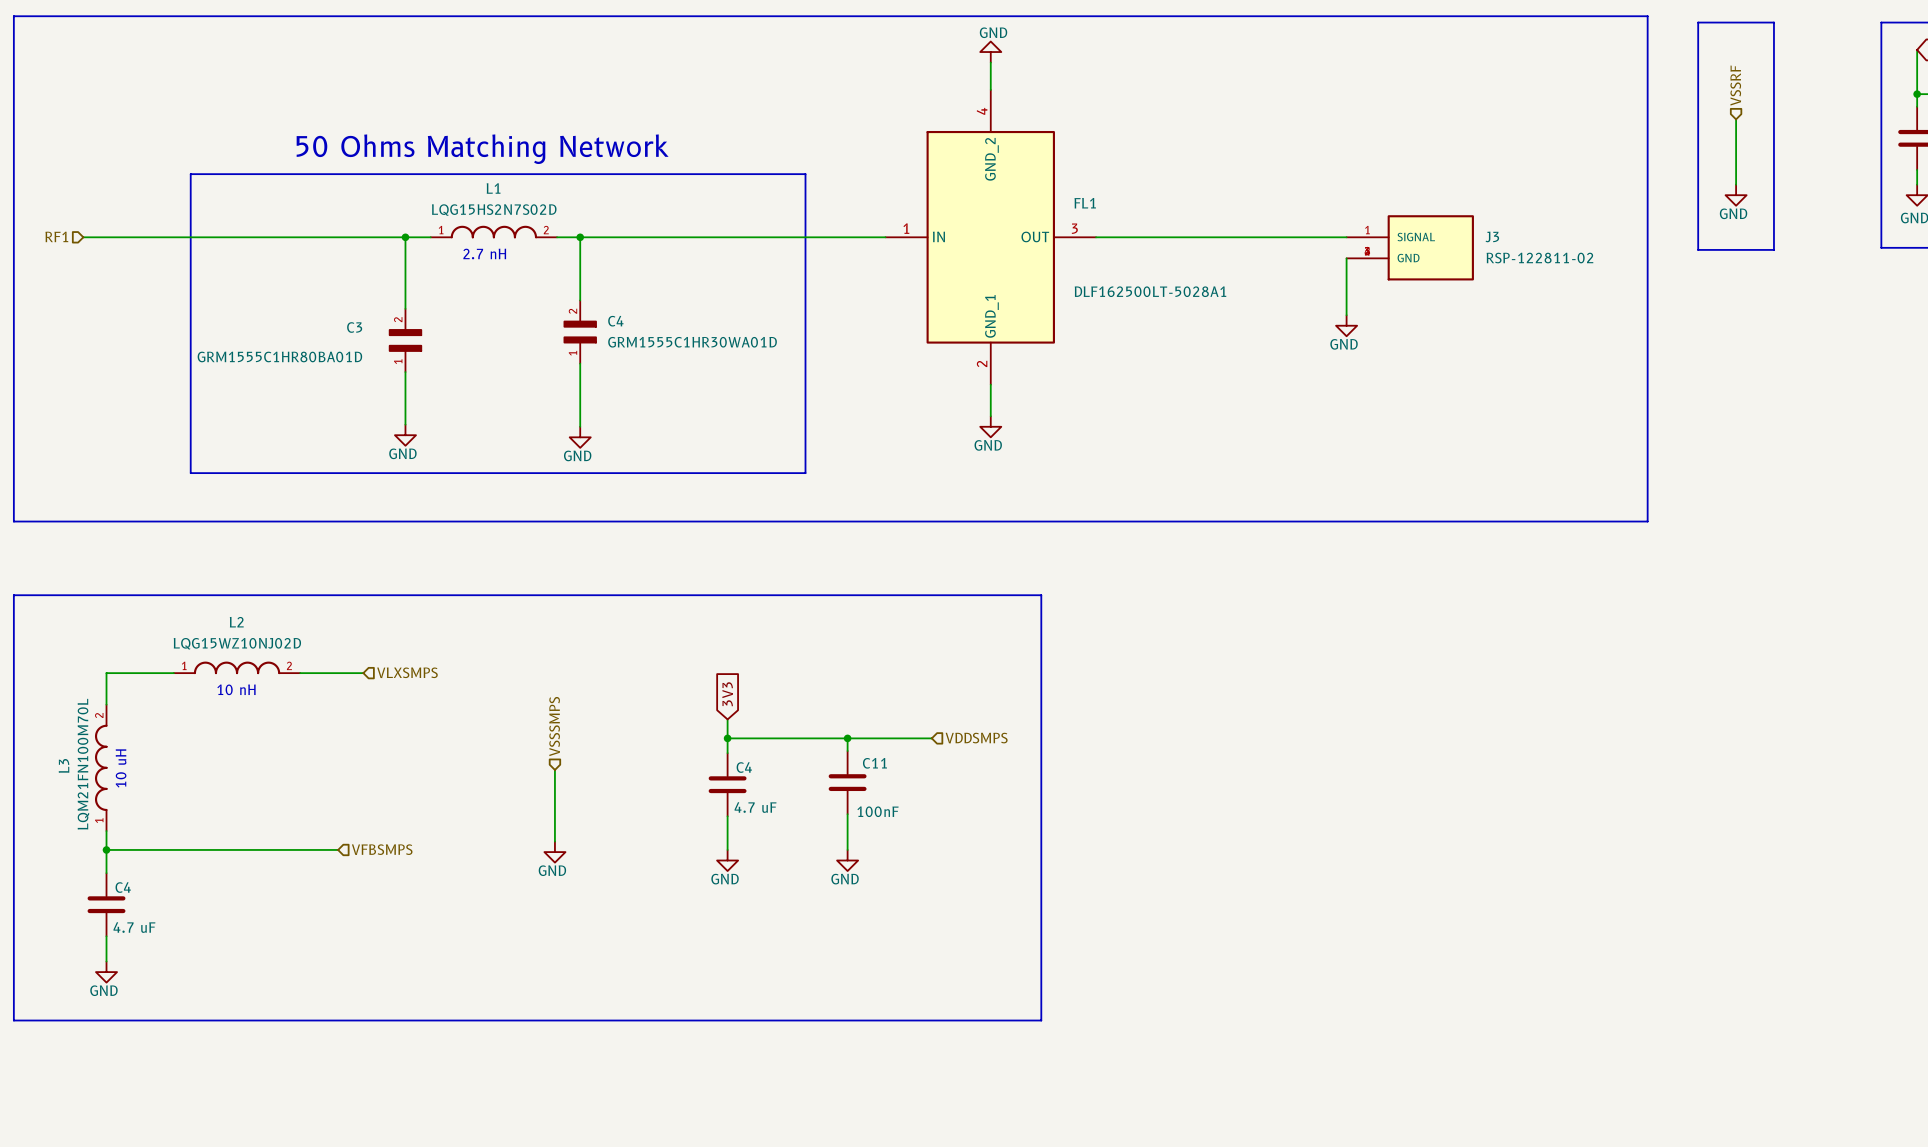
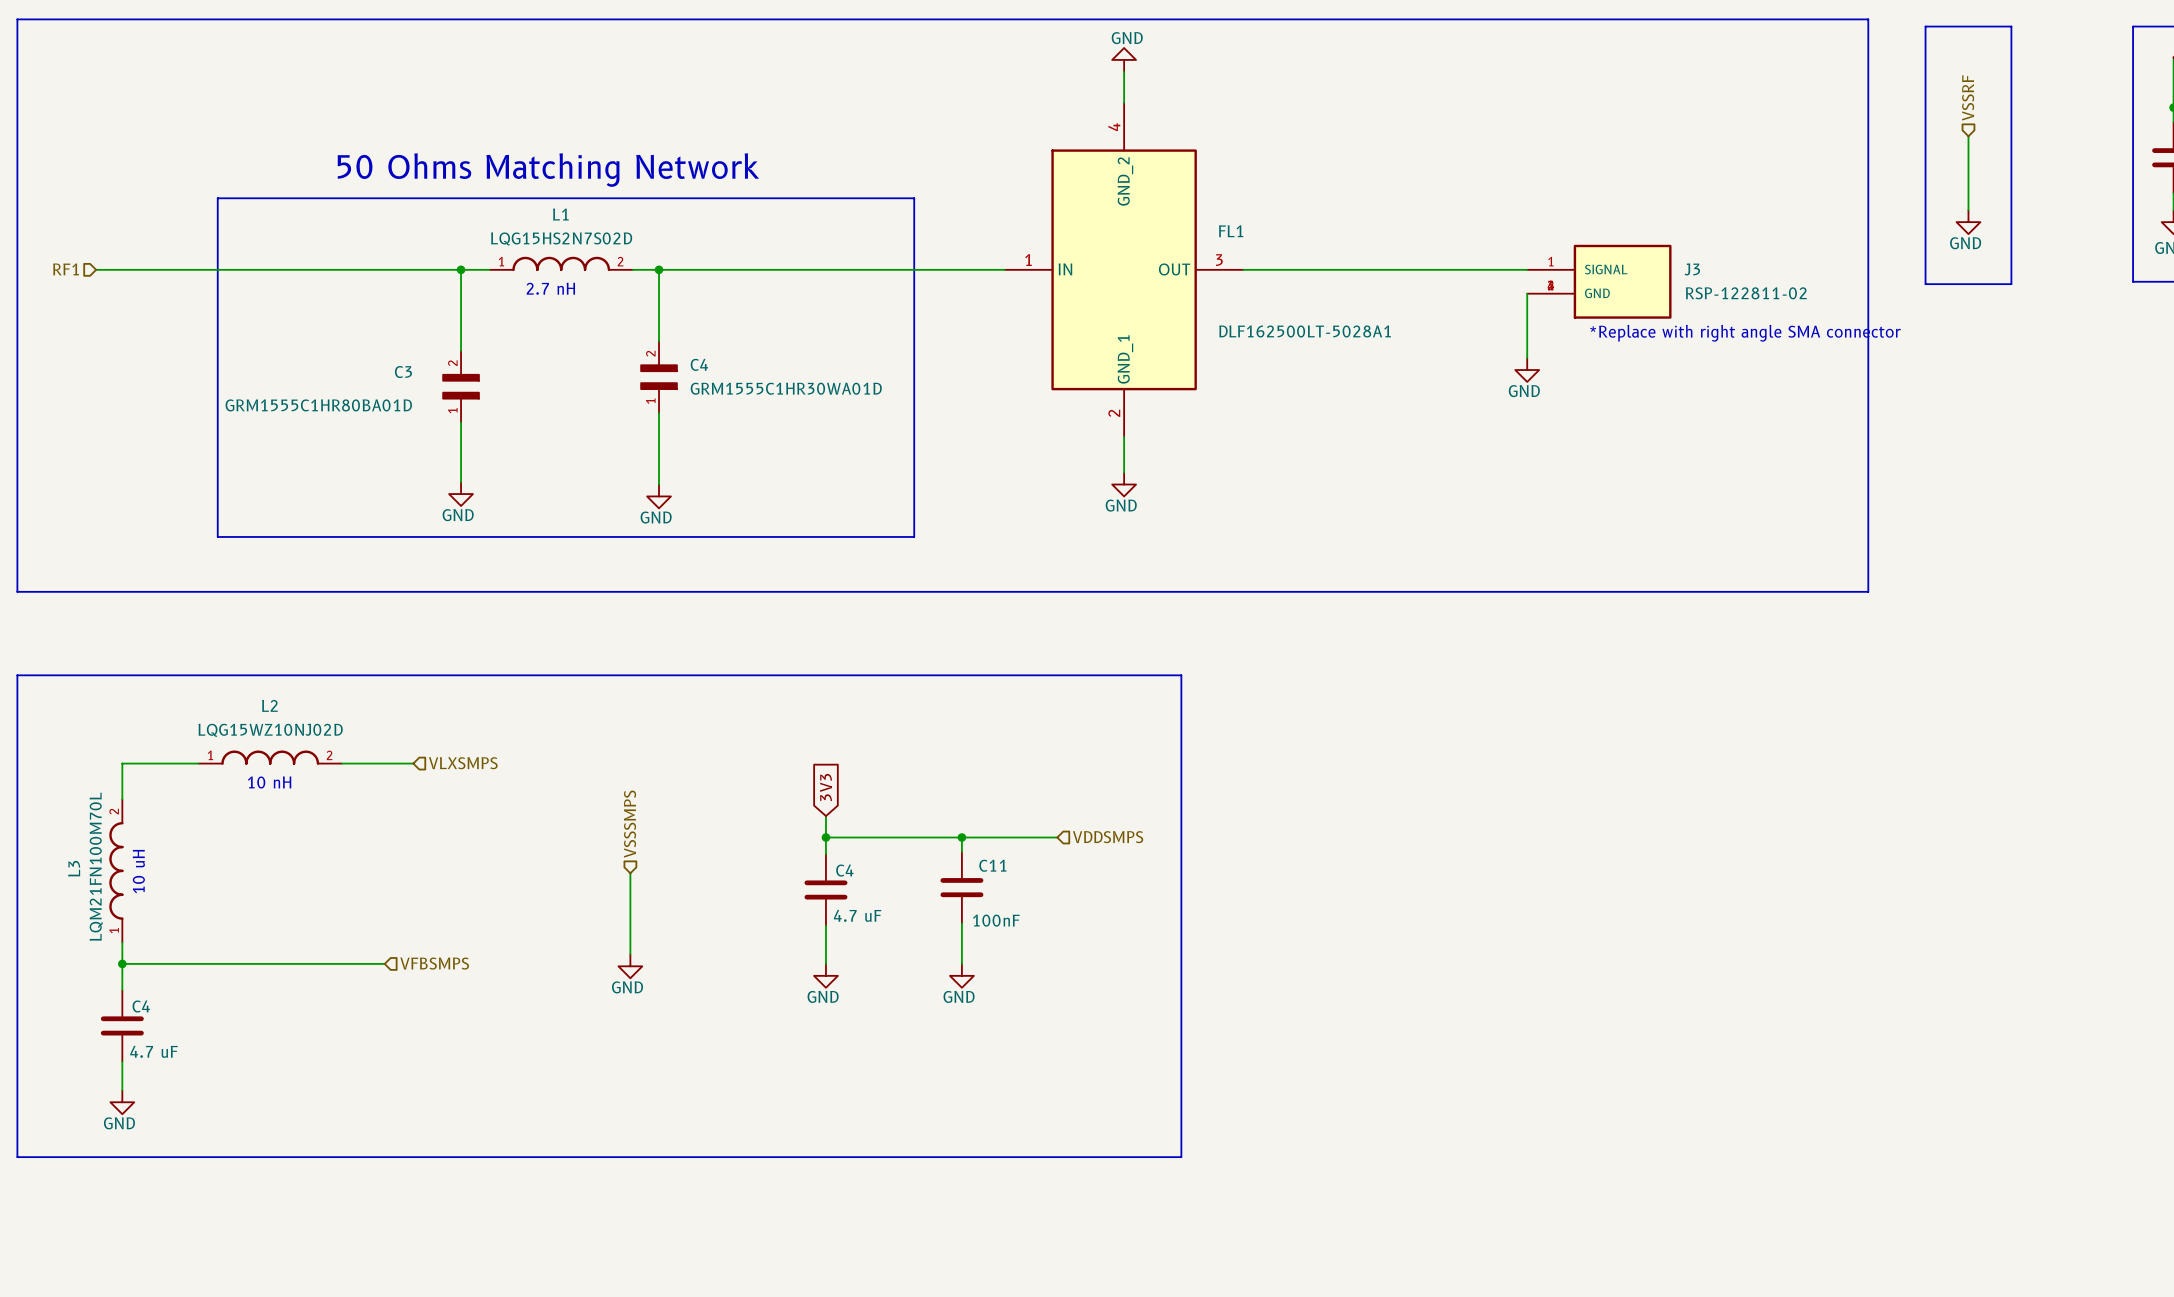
text: none -> *Replace with right angle SMA connector (1745, 333)

